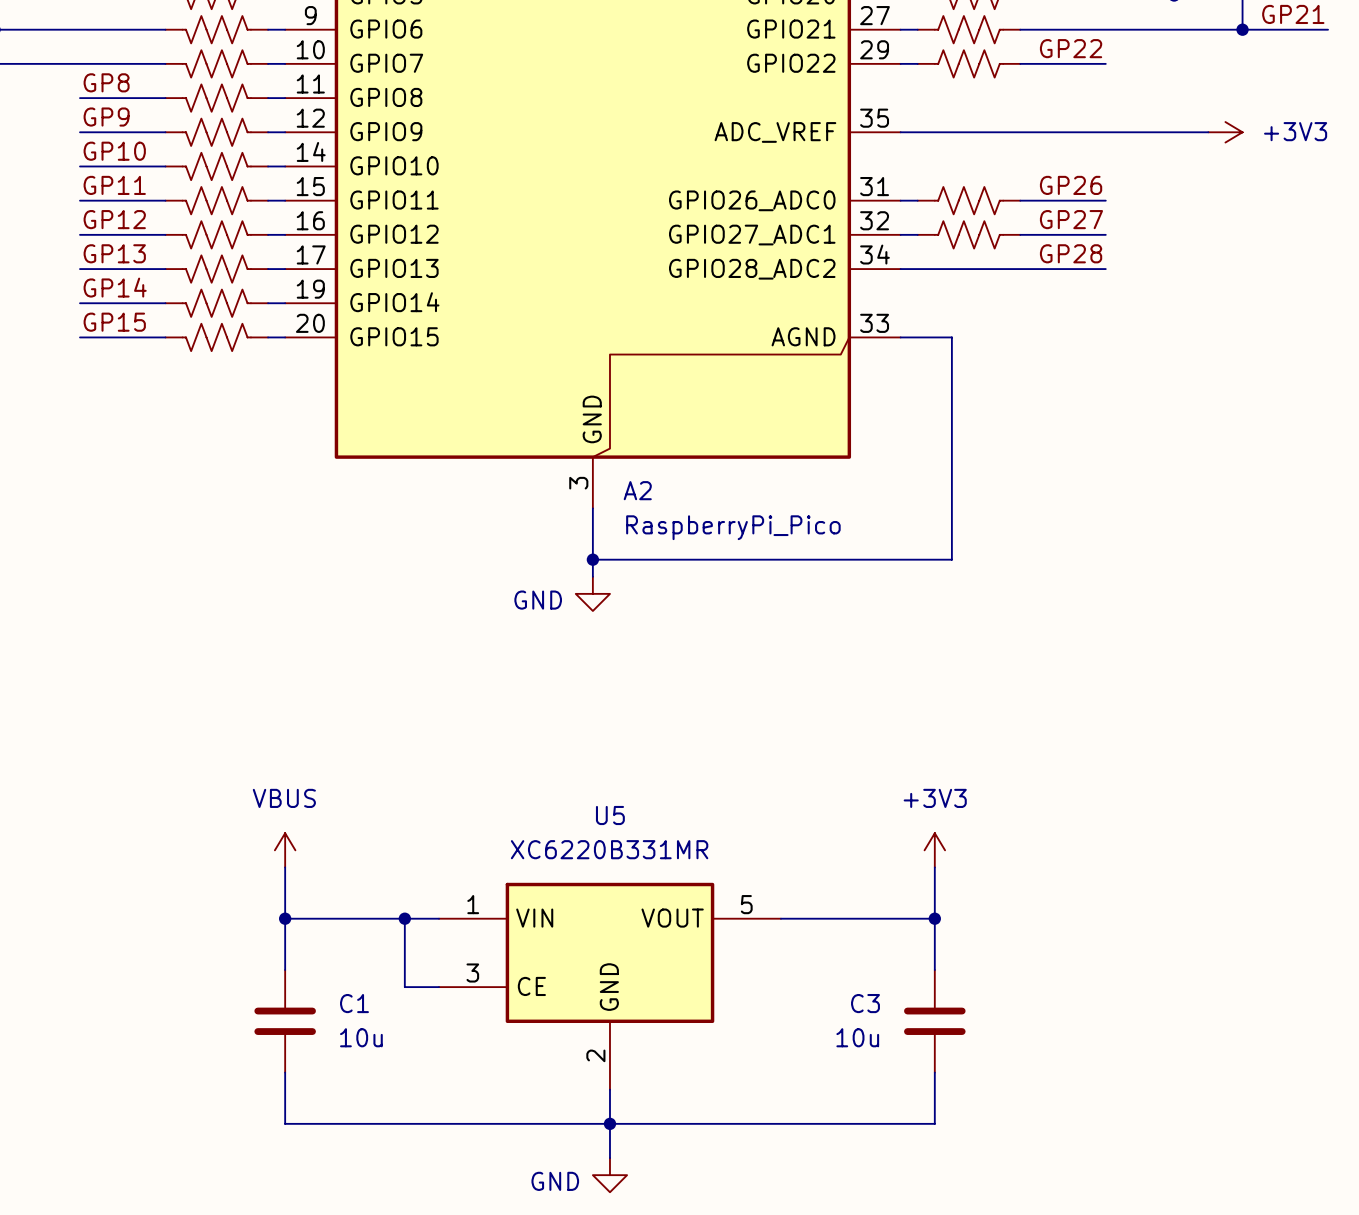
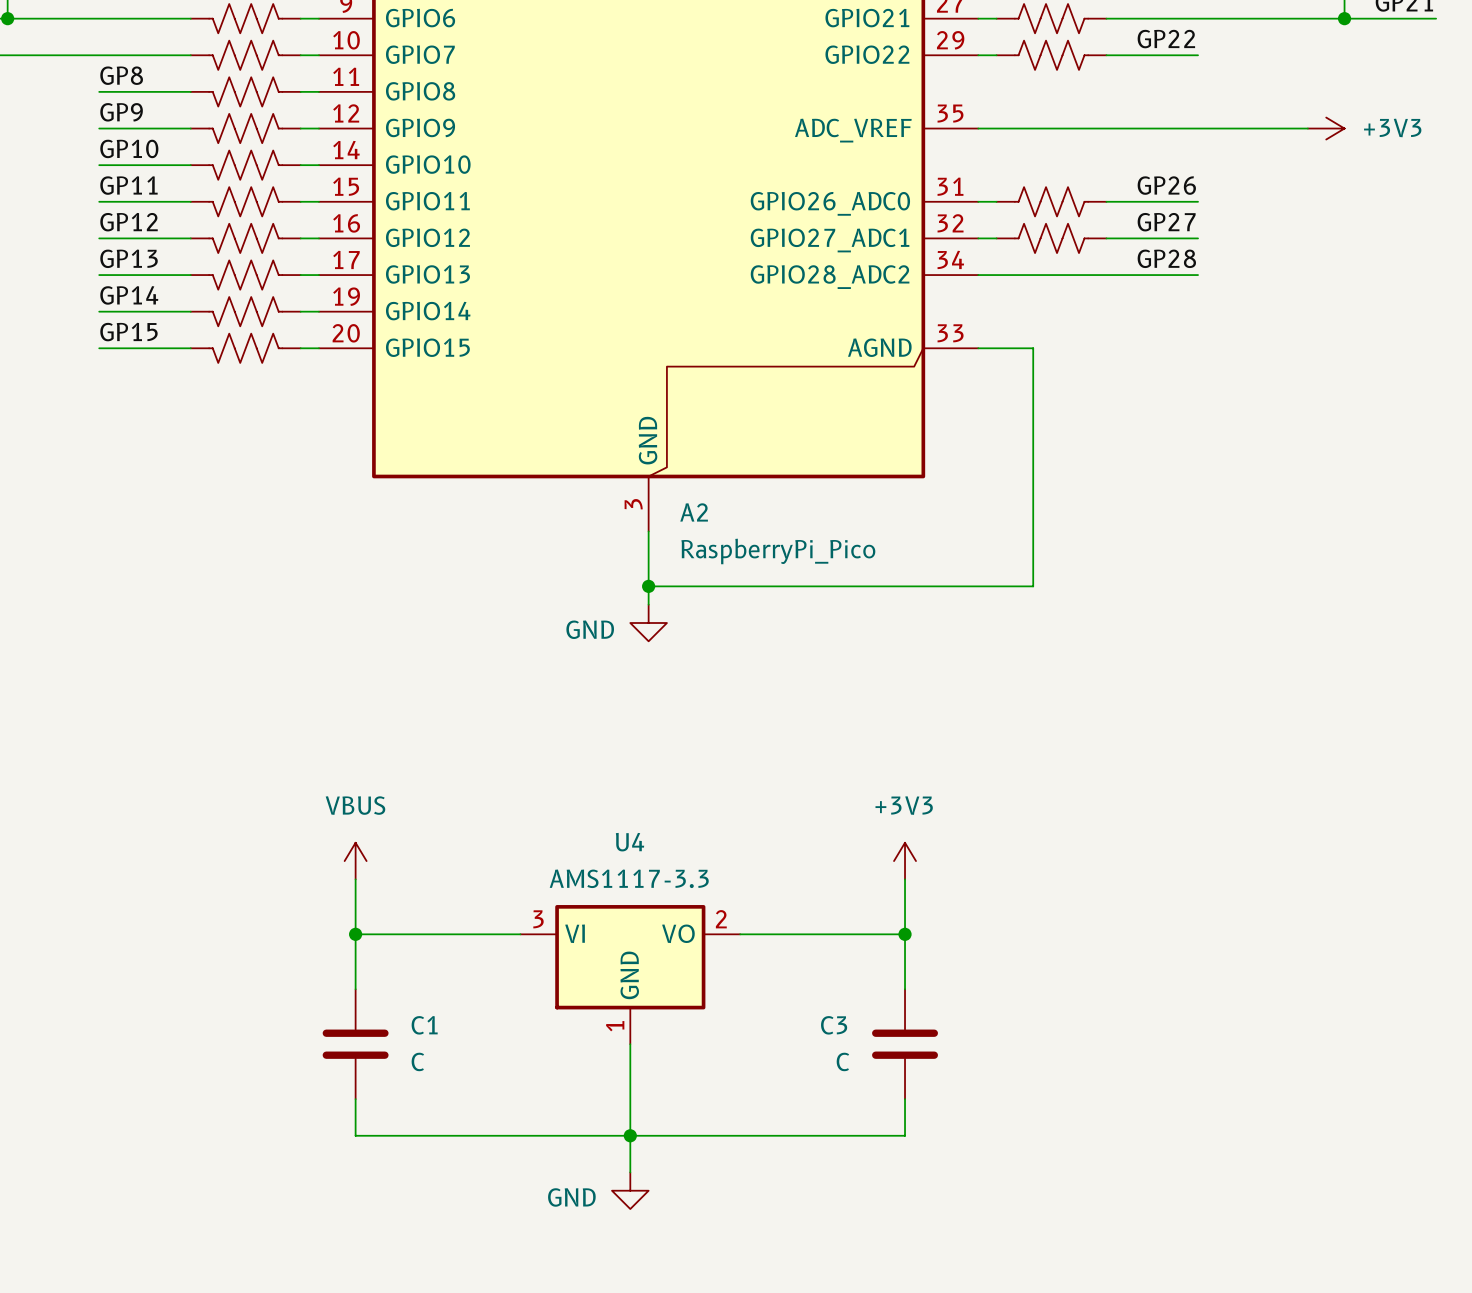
power symbol position: VBUS (285, 850) -> VBUS (355, 861)
power symbol position: +3V3 (934, 850) -> +3V3 (905, 861)
wire: (285, 867) (285, 970) -> (355, 879) (355, 989)
wire: (934, 867) (934, 970) -> (905, 879) (905, 989)
junction: none -> (355, 934)
junction: none -> (905, 934)
wire: (285, 918) (439, 918) -> (355, 934) (520, 934)
junction: (285, 918) -> none
wire: (404, 918) (404, 987) (439, 987) -> none
junction: (404, 918) -> none
wire: (780, 918) (934, 918) -> (740, 934) (905, 934)
junction: (934, 918) -> none
U4: none -> AMS1117-3.3 (630, 974)
U5: XC6220B331MR (609, 986) -> none
wire: none -> (630, 1044) (630, 1172)
C1 position: (285, 1021) -> (355, 1044)
C3 position: (934, 1021) -> (905, 1044)
C1 value: 10u (361, 1037) -> C (417, 1061)
C3 value: 10u (857, 1037) -> C (842, 1061)
wire: none -> (355, 1099) (355, 1135) (905, 1135) (905, 1099)
wire: (285, 1072) (285, 1123) (934, 1123) (934, 1072) -> none
wire: (609, 1089) (609, 1158) -> none
junction position: (609, 1123) -> (630, 1135)
power symbol position: GND (609, 1175) -> GND (630, 1190)

